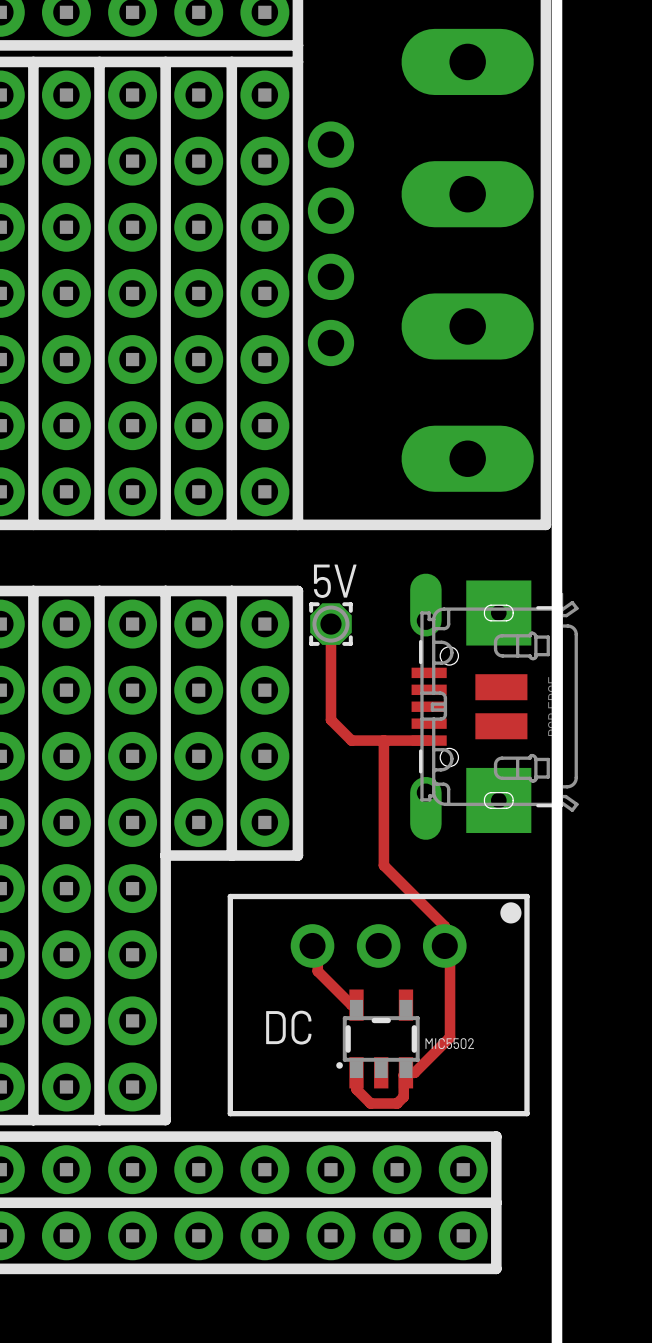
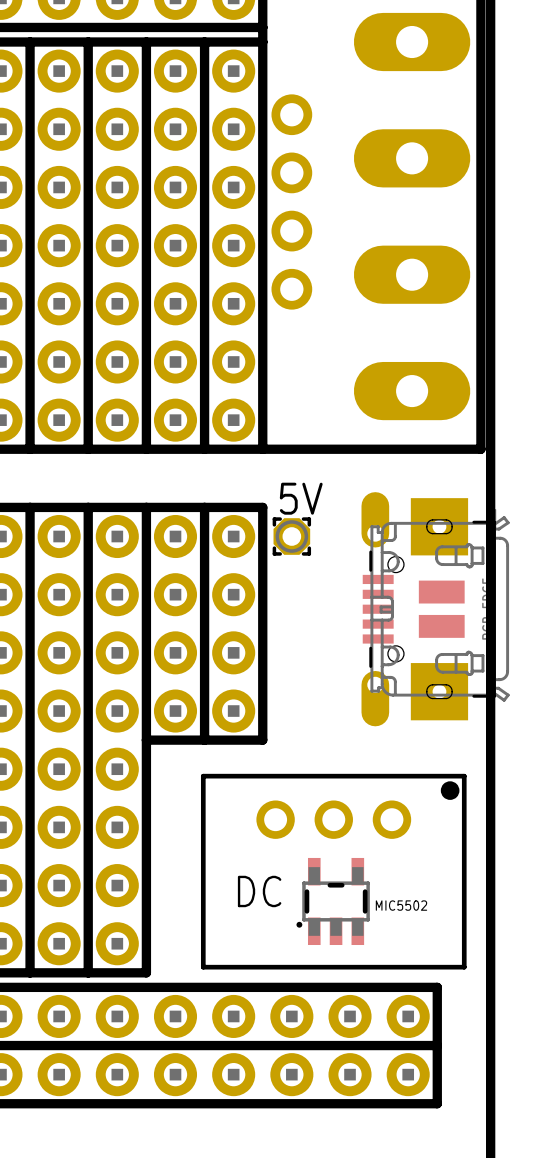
track: (330, 624) (330, 719) (351, 740) (429, 740) -> none
track: (383, 740) (383, 865) (444, 926) (444, 945) (450, 951) (450, 1037) (414, 1072) (405, 1072) (403, 1075) (403, 1096) (397, 1103) (370, 1103) (356, 1089) (356, 1072) -> none
track: (312, 945) (317, 951) (317, 971) (351, 1005) (356, 1005) -> none

